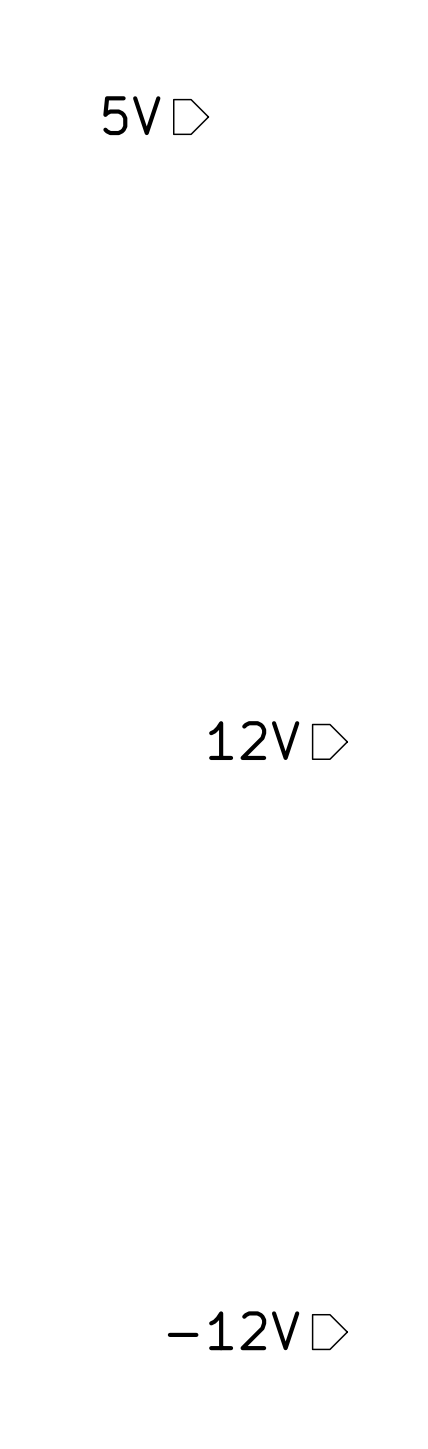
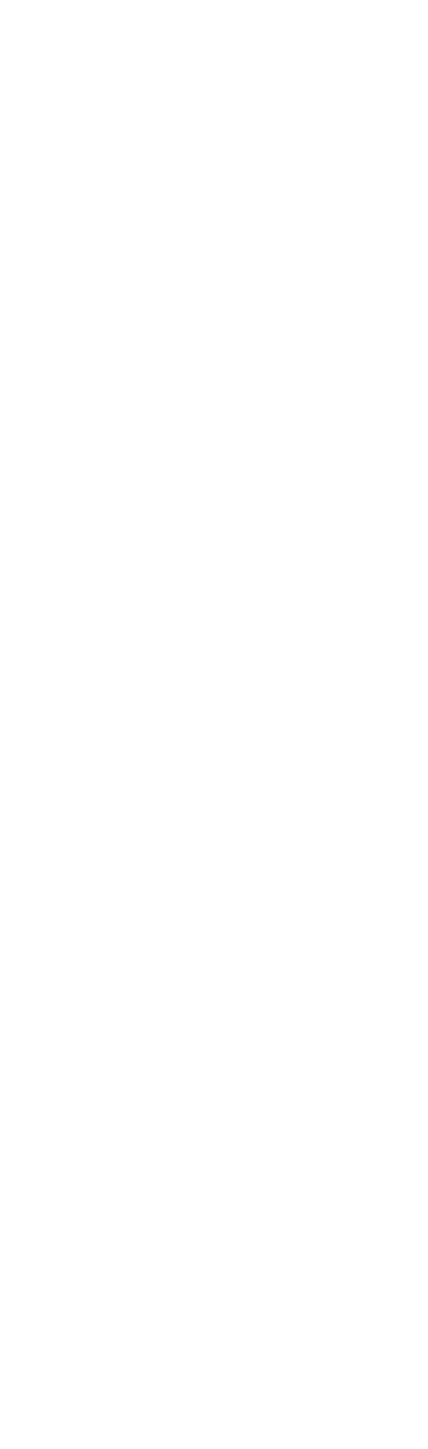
hierarchical label: 5V (131, 115) -> none
hierarchical label: 12V (254, 740) -> none
hierarchical label: -12V (233, 1330) -> none

